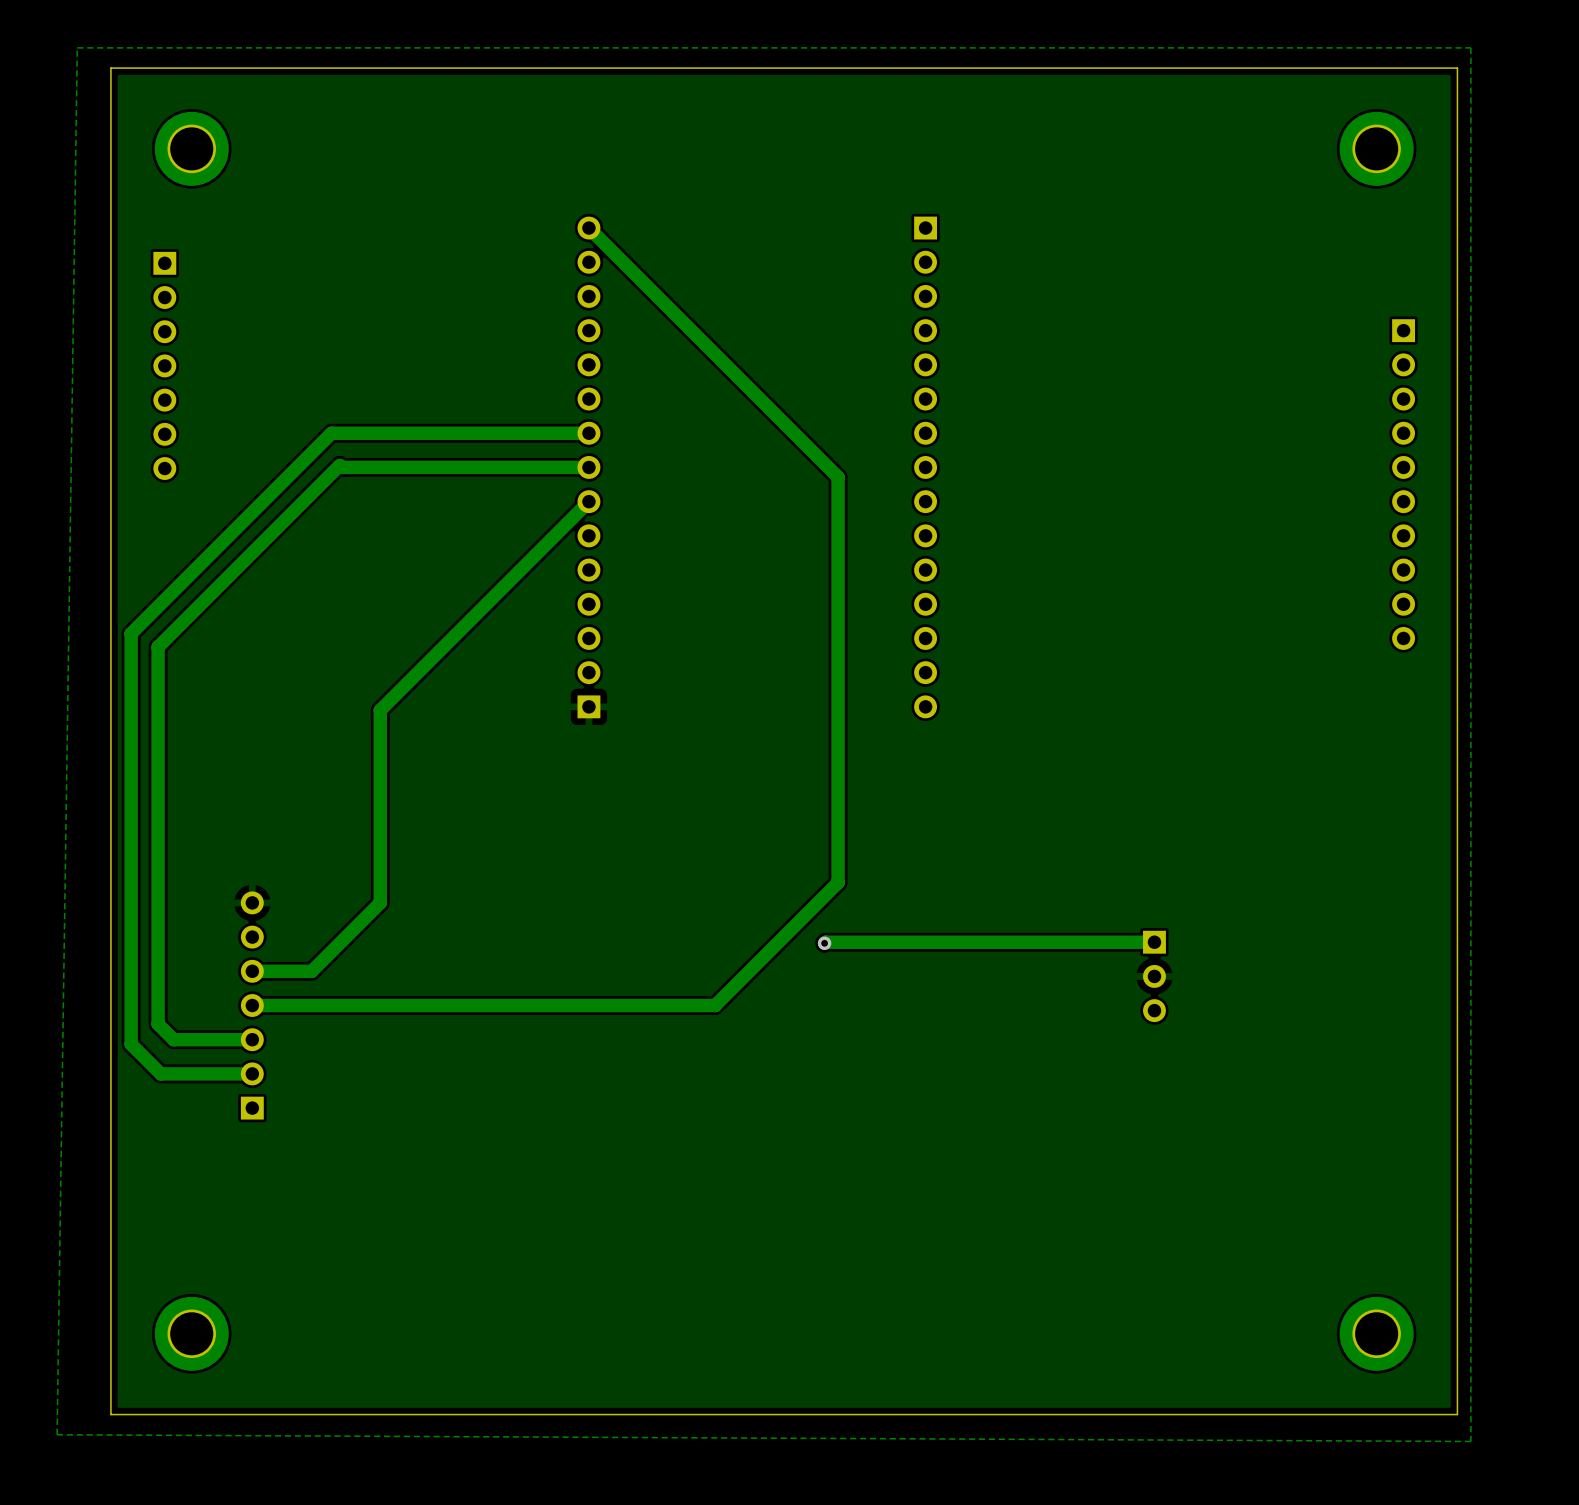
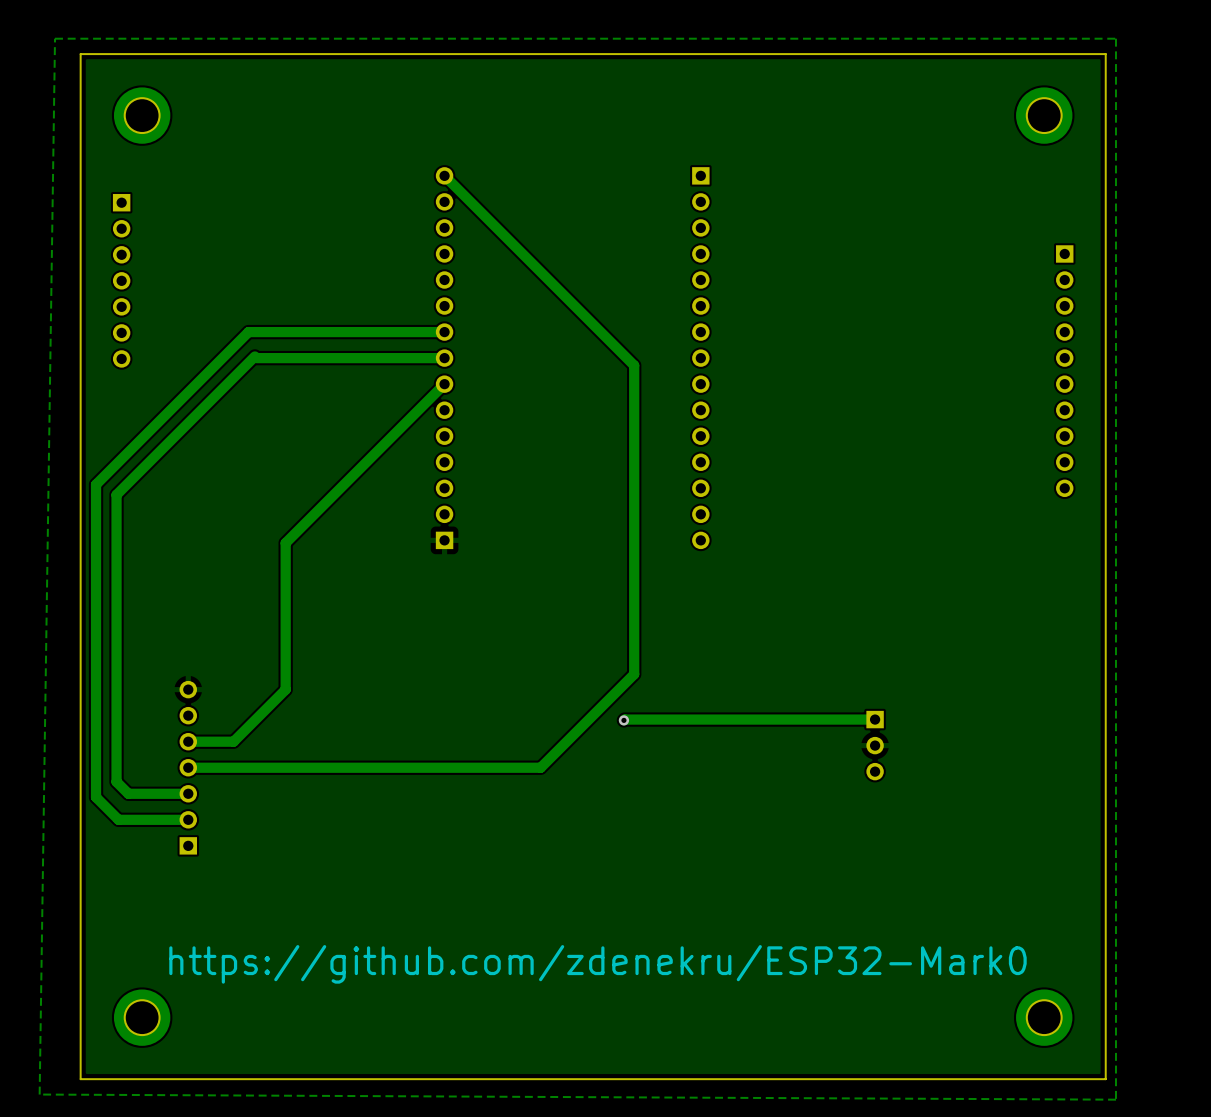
text: none -> https://github.com/zdenekru/ESP32-Mark0 (597, 964)

